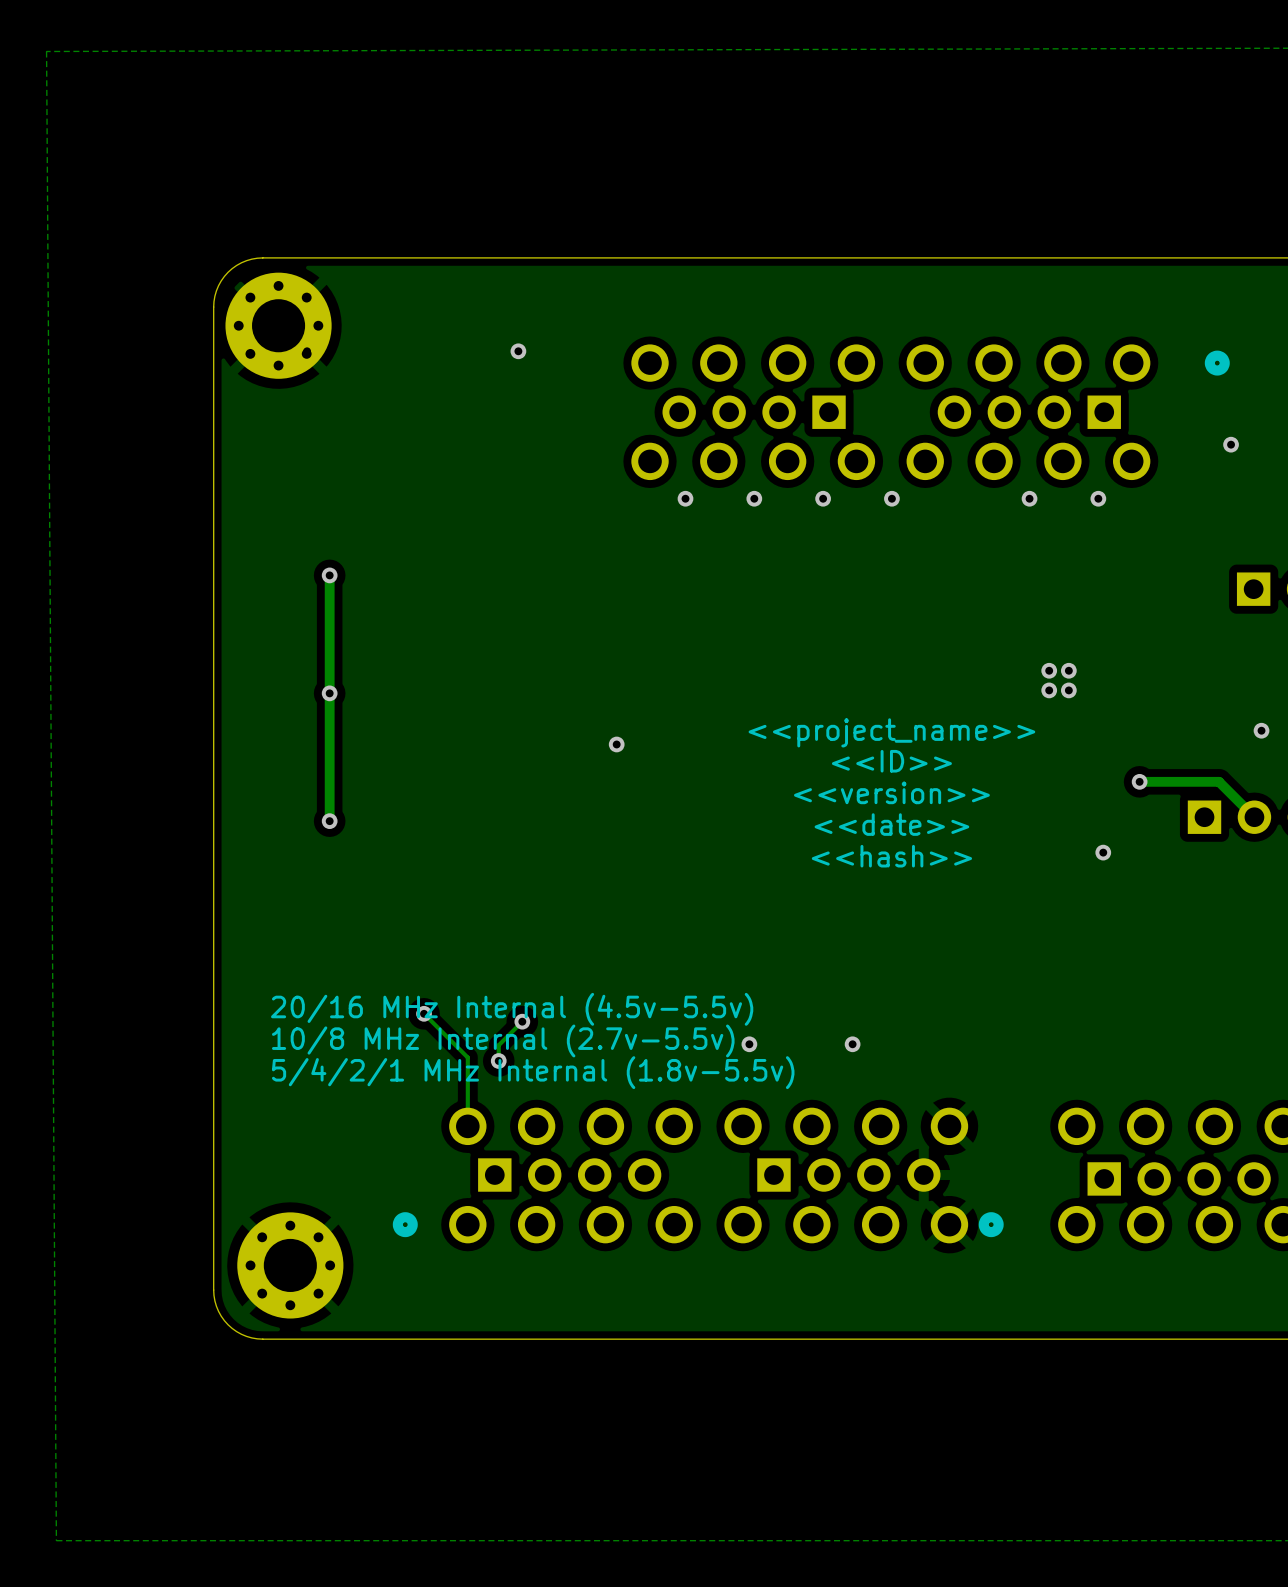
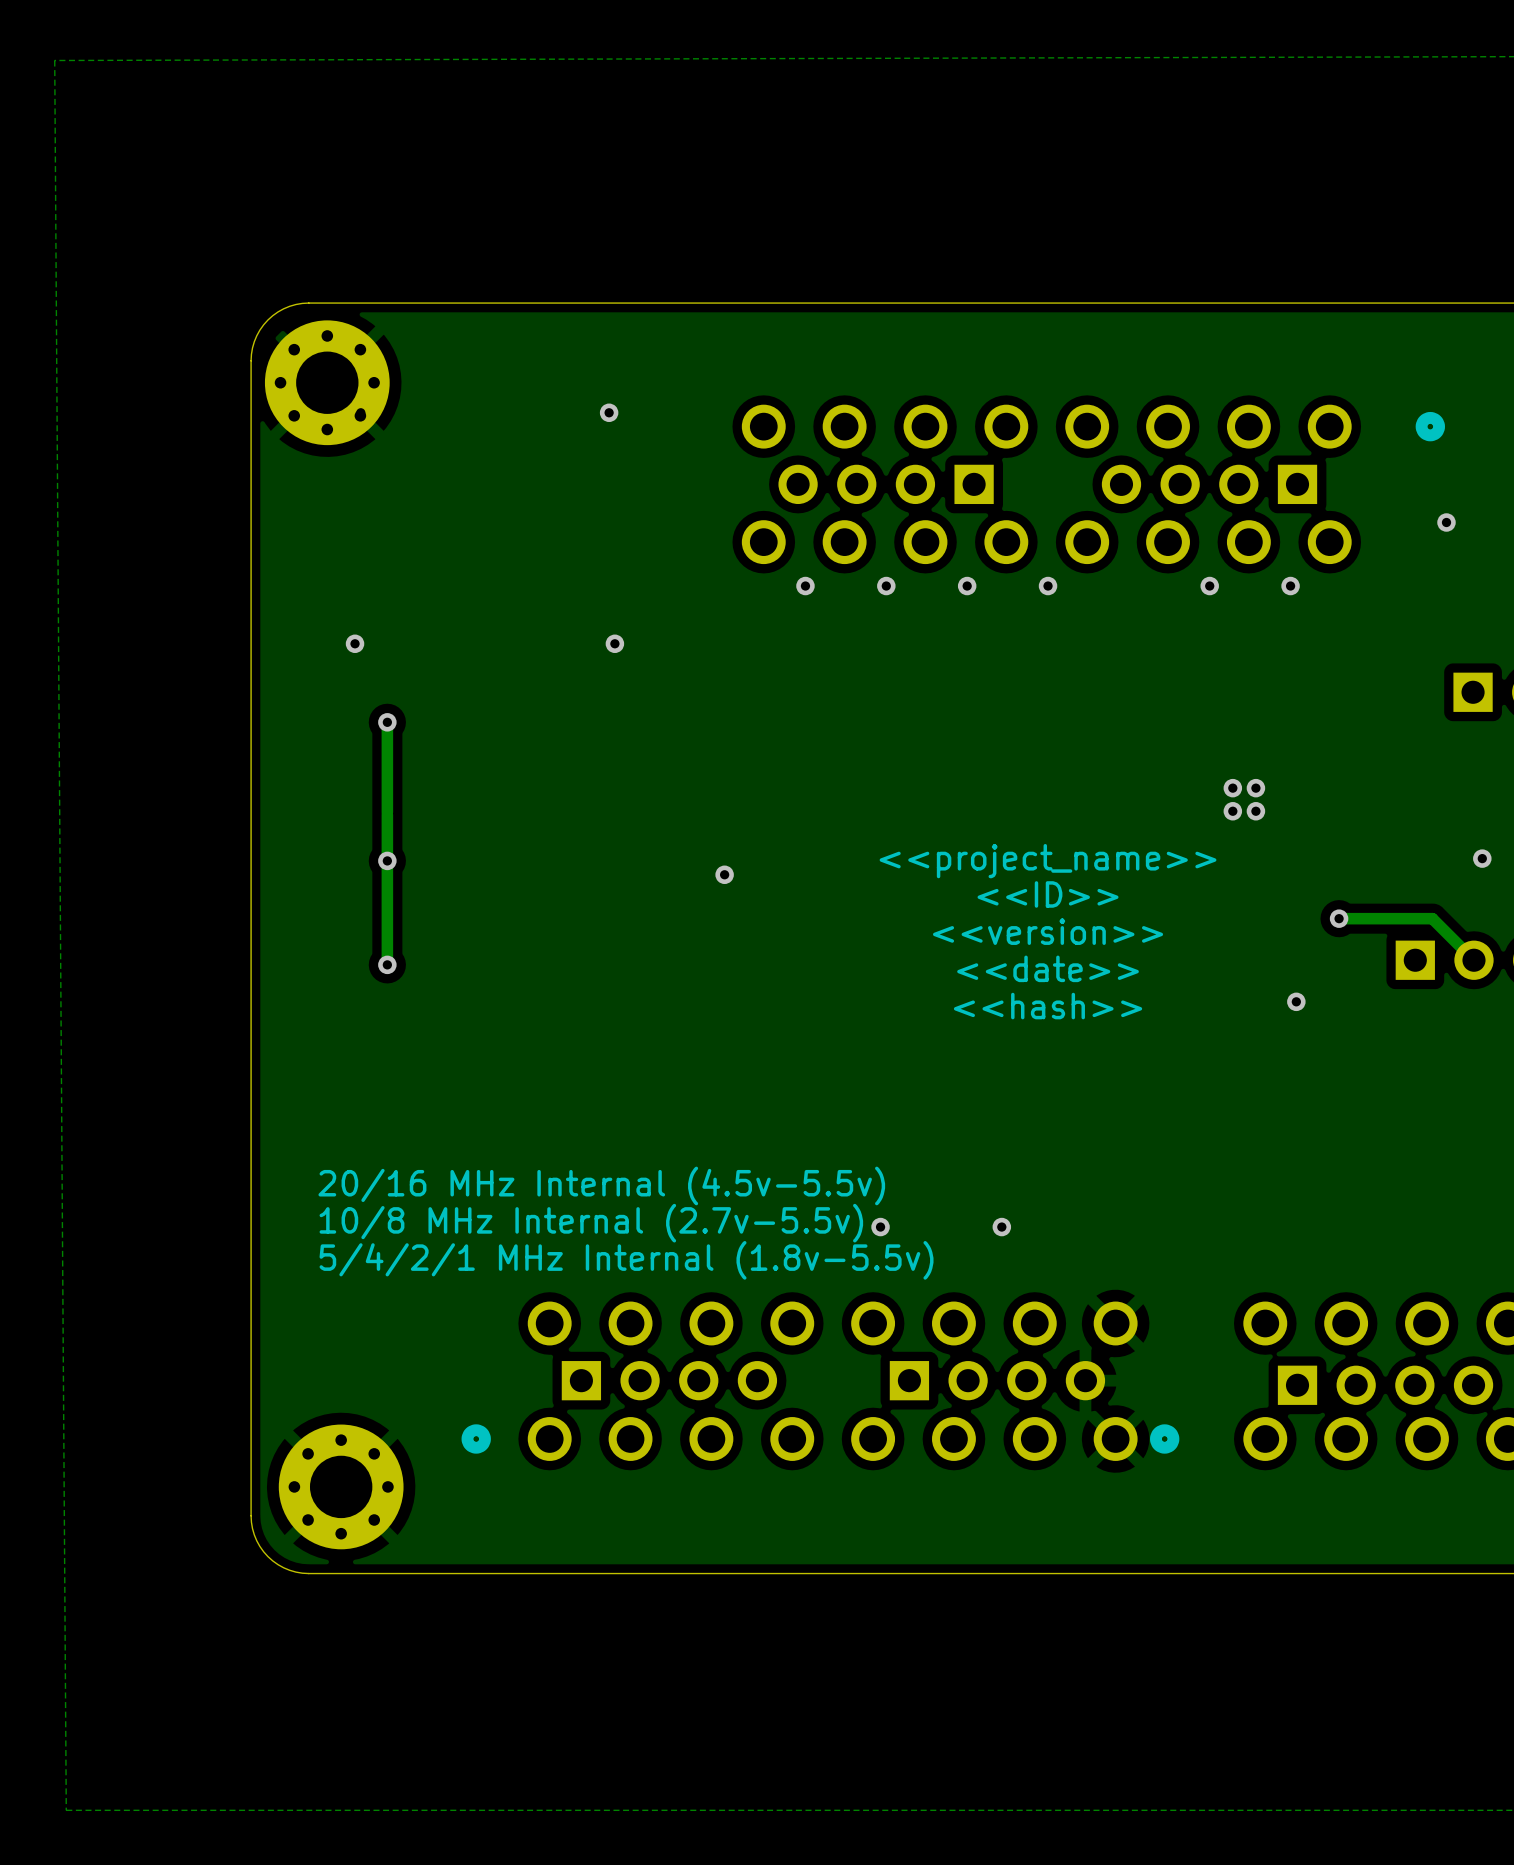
via: none -> (355, 643)
via: none -> (614, 643)
via: (329, 575) -> none
track: (329, 577) (329, 616) -> none
via: none -> (387, 722)
via: (329, 693) -> none
via: none -> (387, 860)
track: (424, 1013) (467, 1057) (467, 1126) -> none
via: (424, 1013) -> none
track: (522, 1021) (498, 1045) (498, 1060) -> none
via: (522, 1021) -> none
via: (498, 1060) -> none

